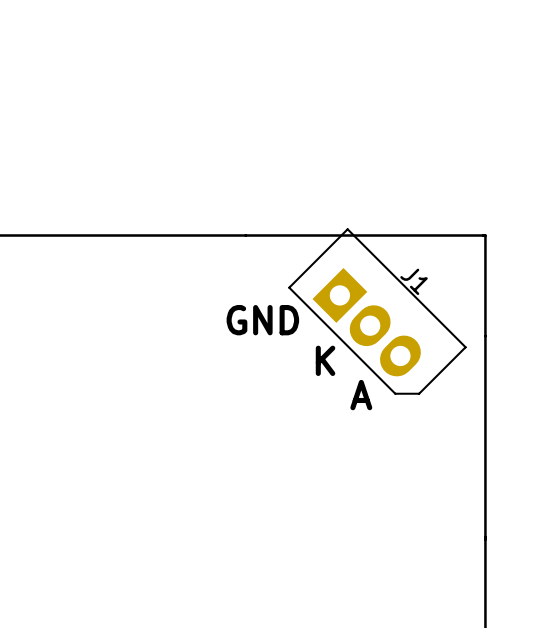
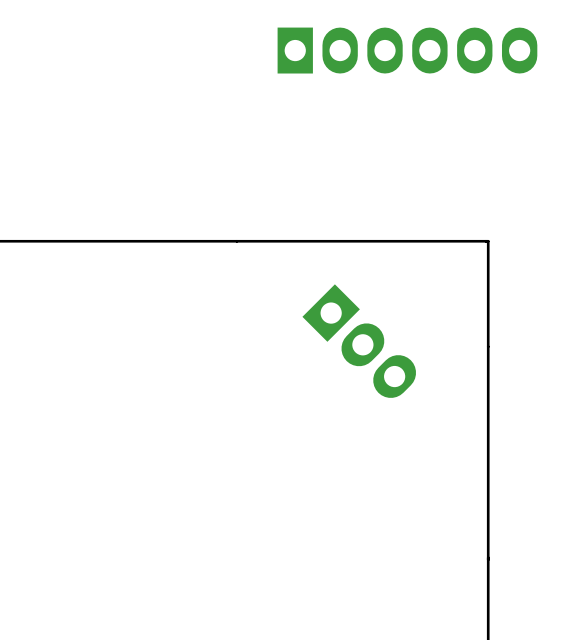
part: none -> (407, 50)
J1 side: bottom (377, 311) -> top (359, 341)
text: GND (262, 320) -> none
text: K (325, 360) -> none
text: A (361, 395) -> none

